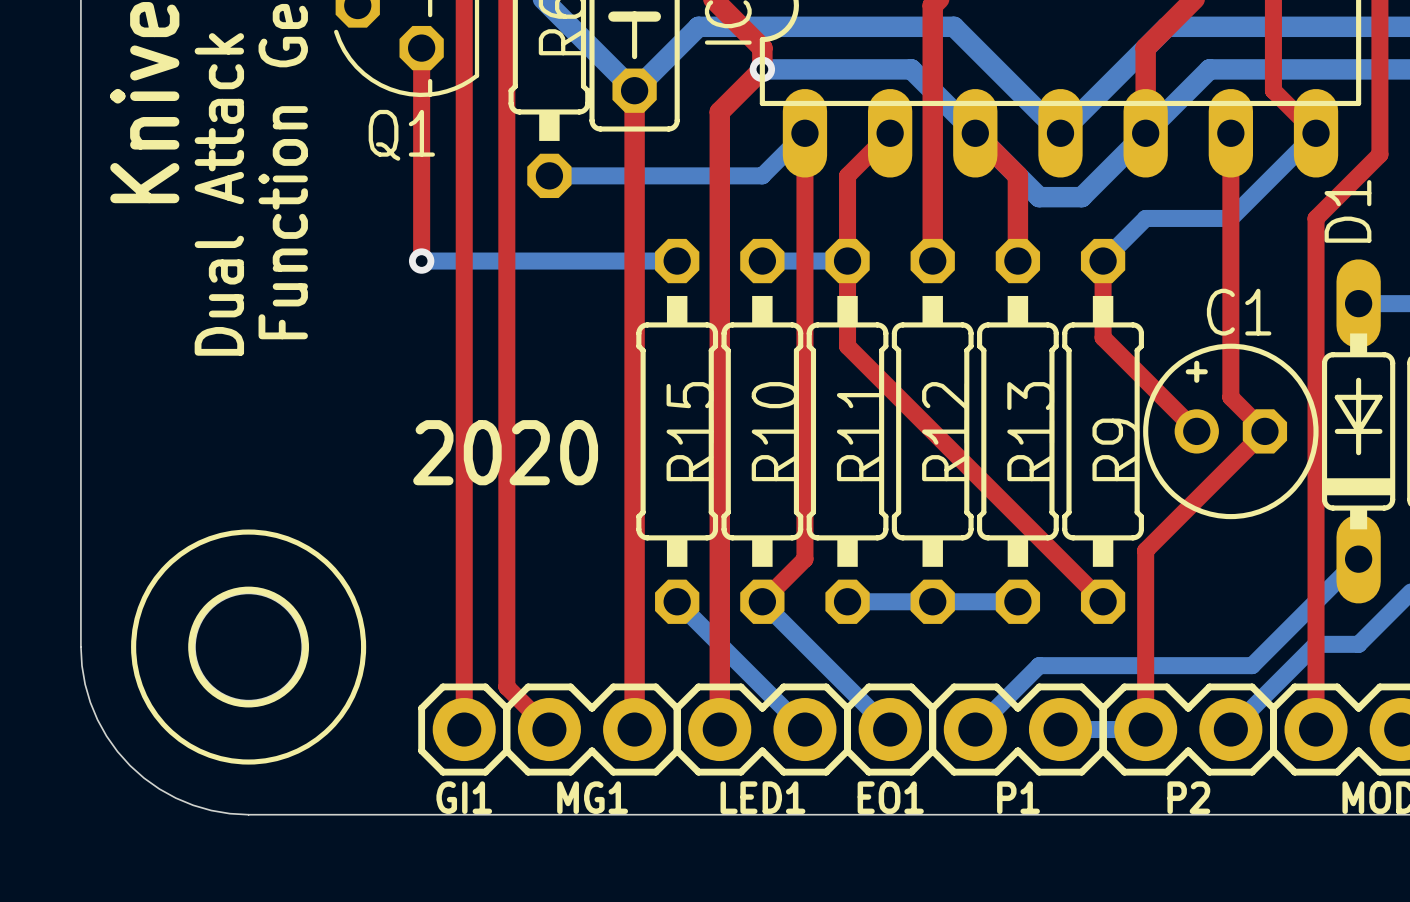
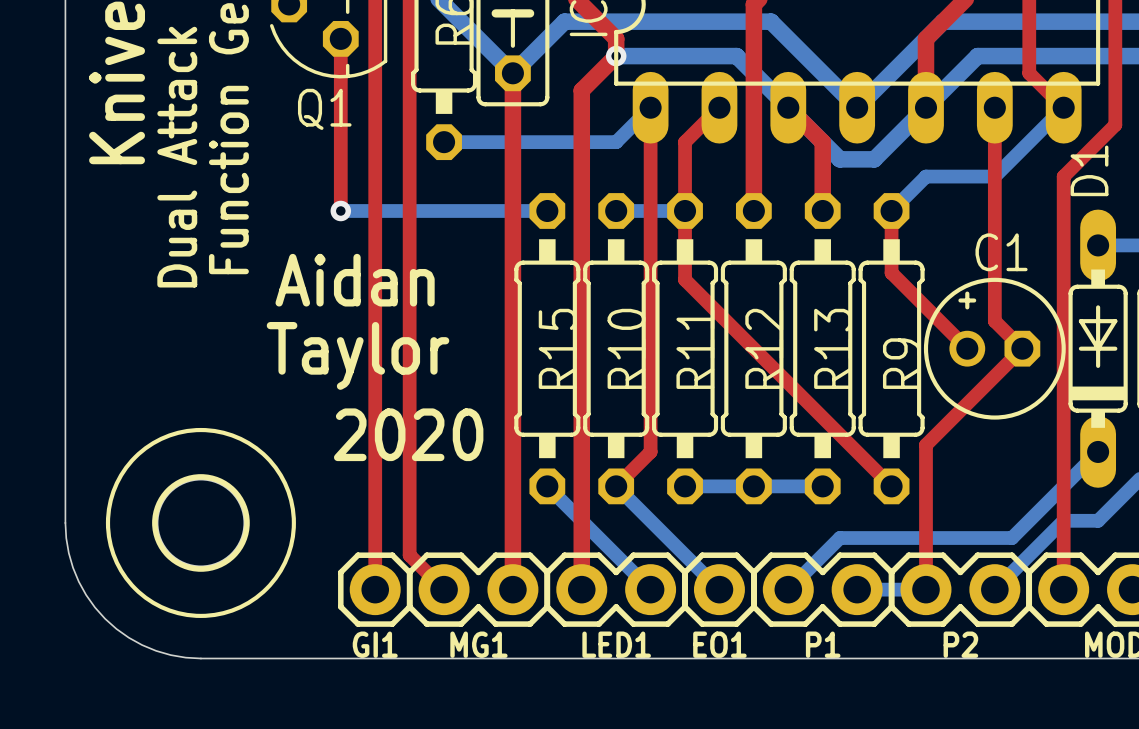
text: none -> Aidan (355, 280)
text: none -> Taylor (358, 355)
text position: 2020 (505, 452) -> 2020 (408, 434)

